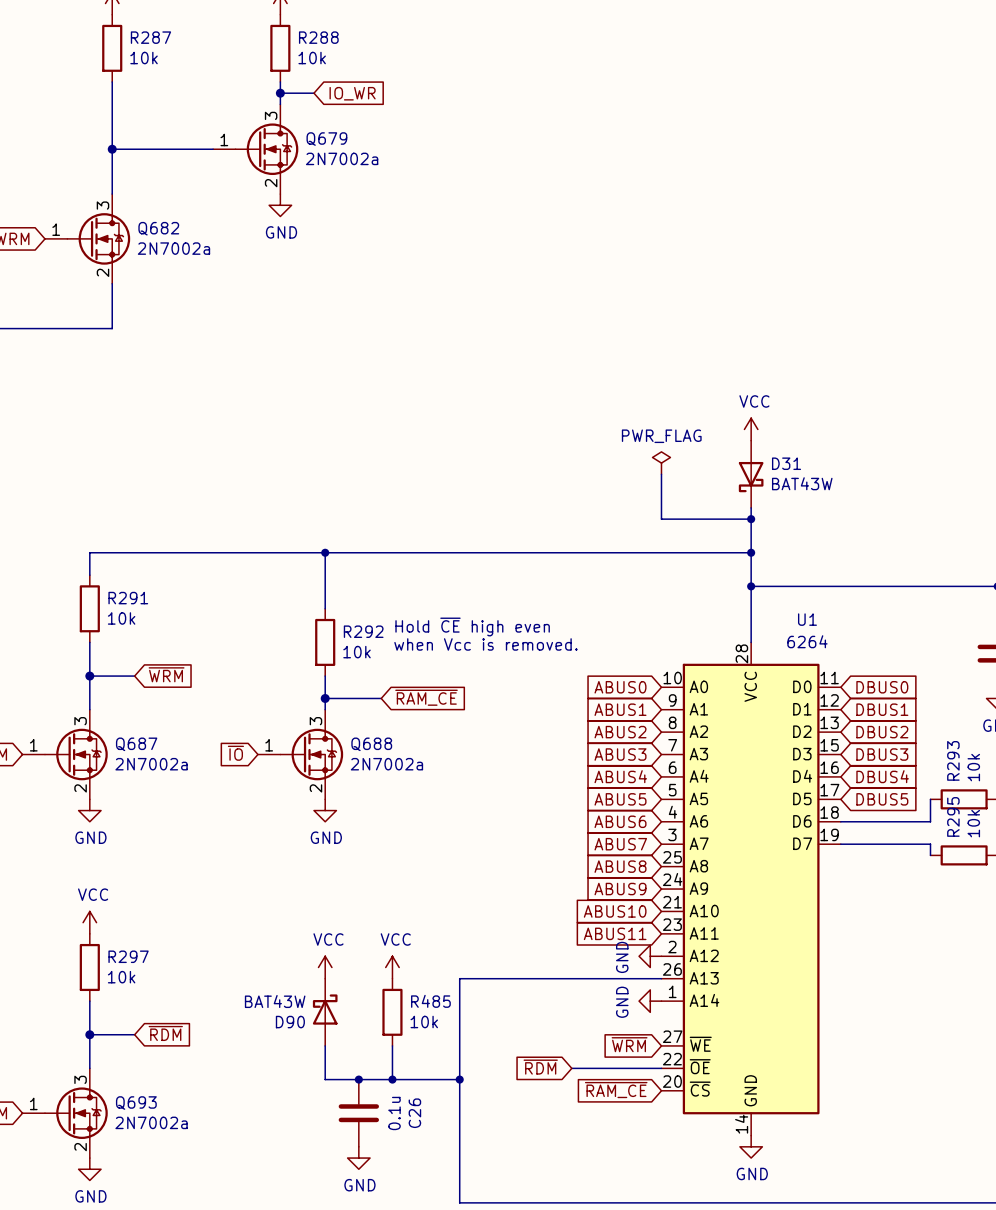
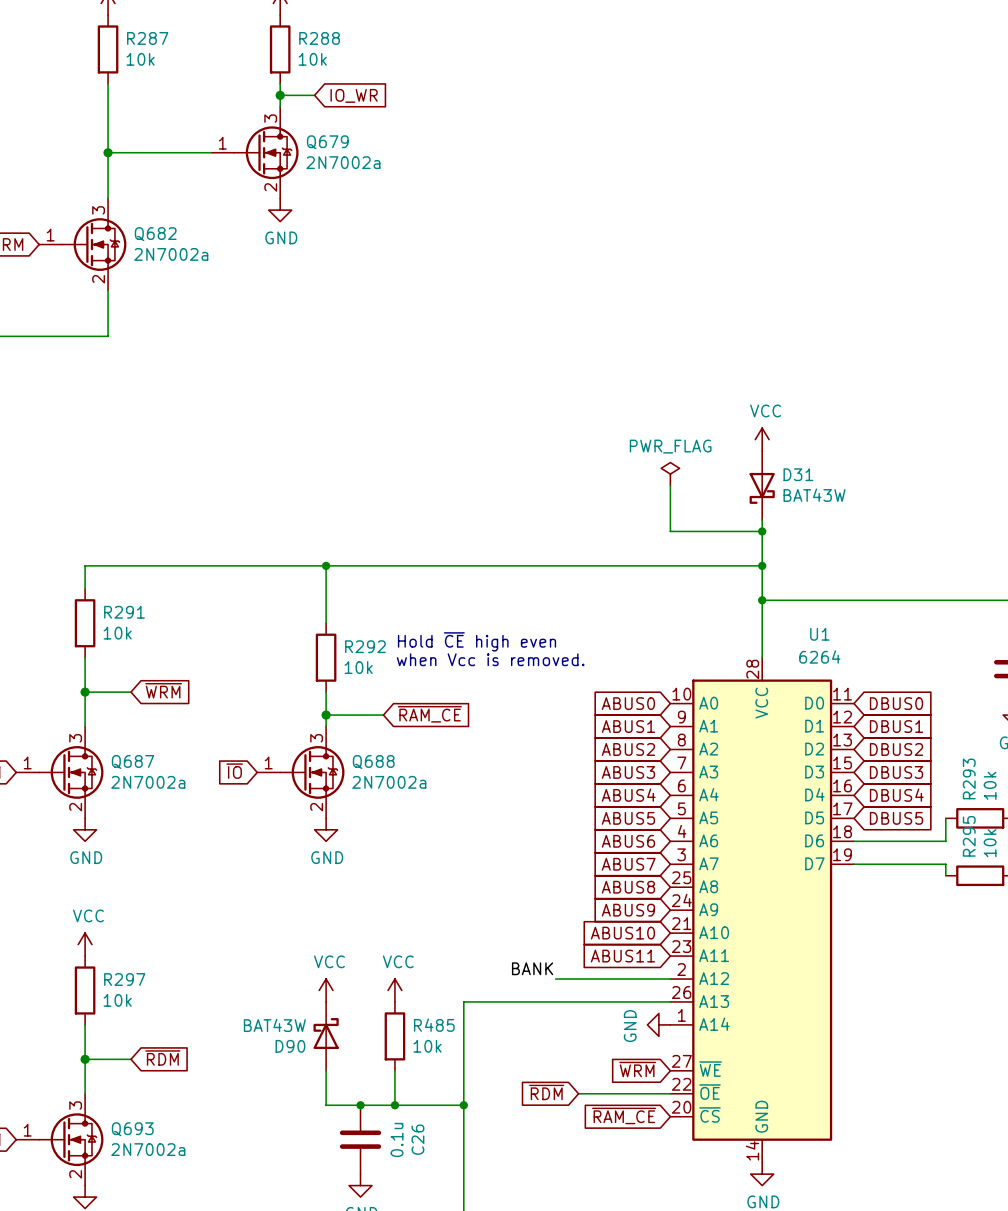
label: none -> BANK (532, 968)
wire: none -> (555, 979) (670, 979)
power symbol: GND (650, 956) -> none

